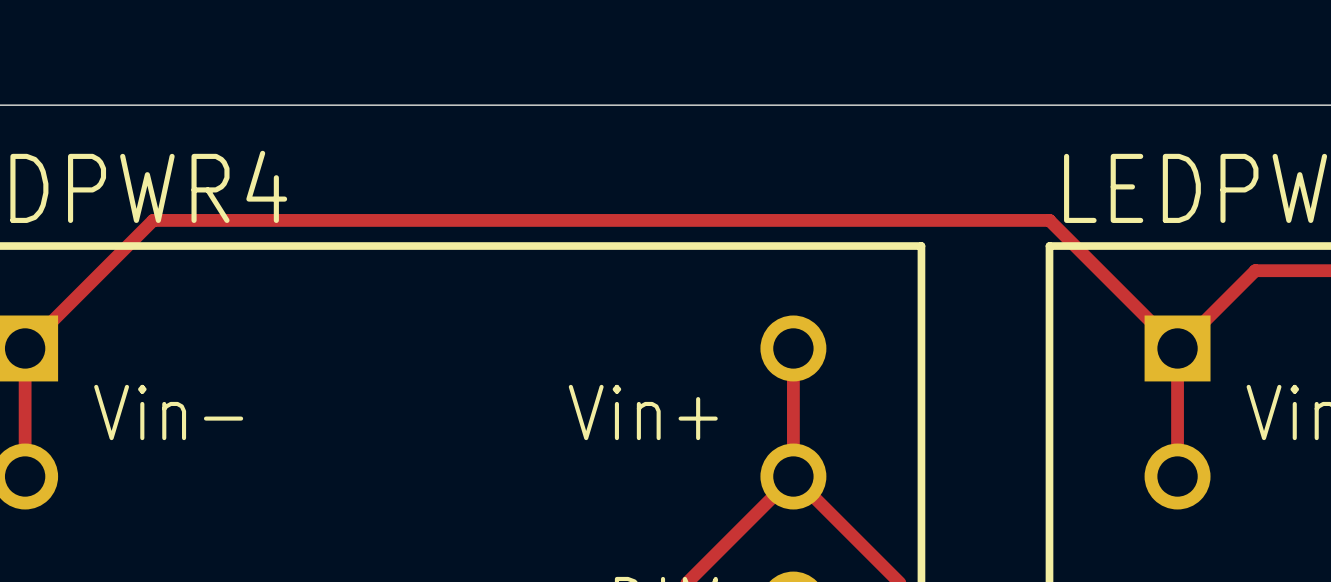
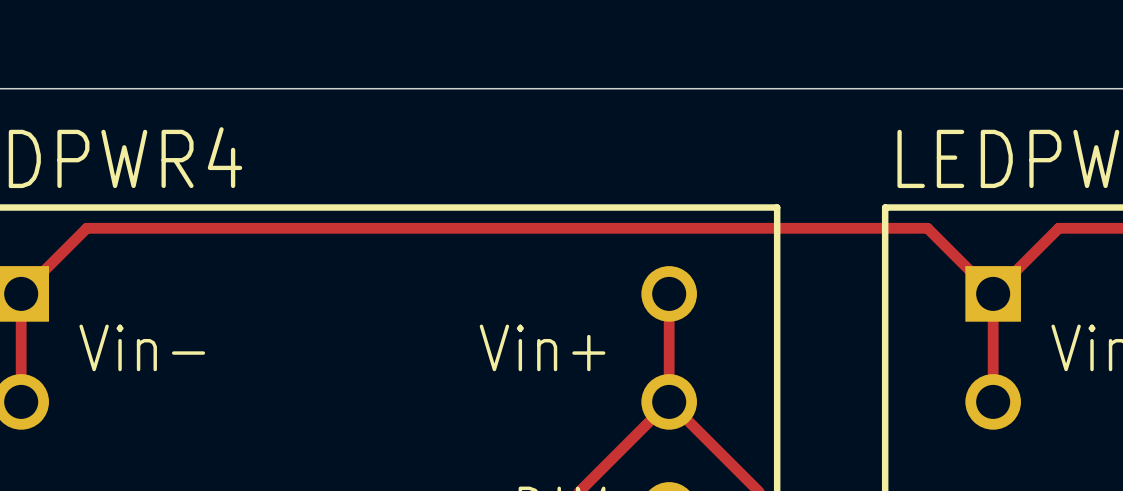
top track: (102, 270) (153, 220) (1049, 220) (1099, 270) -> (86, 228) (927, 228)

